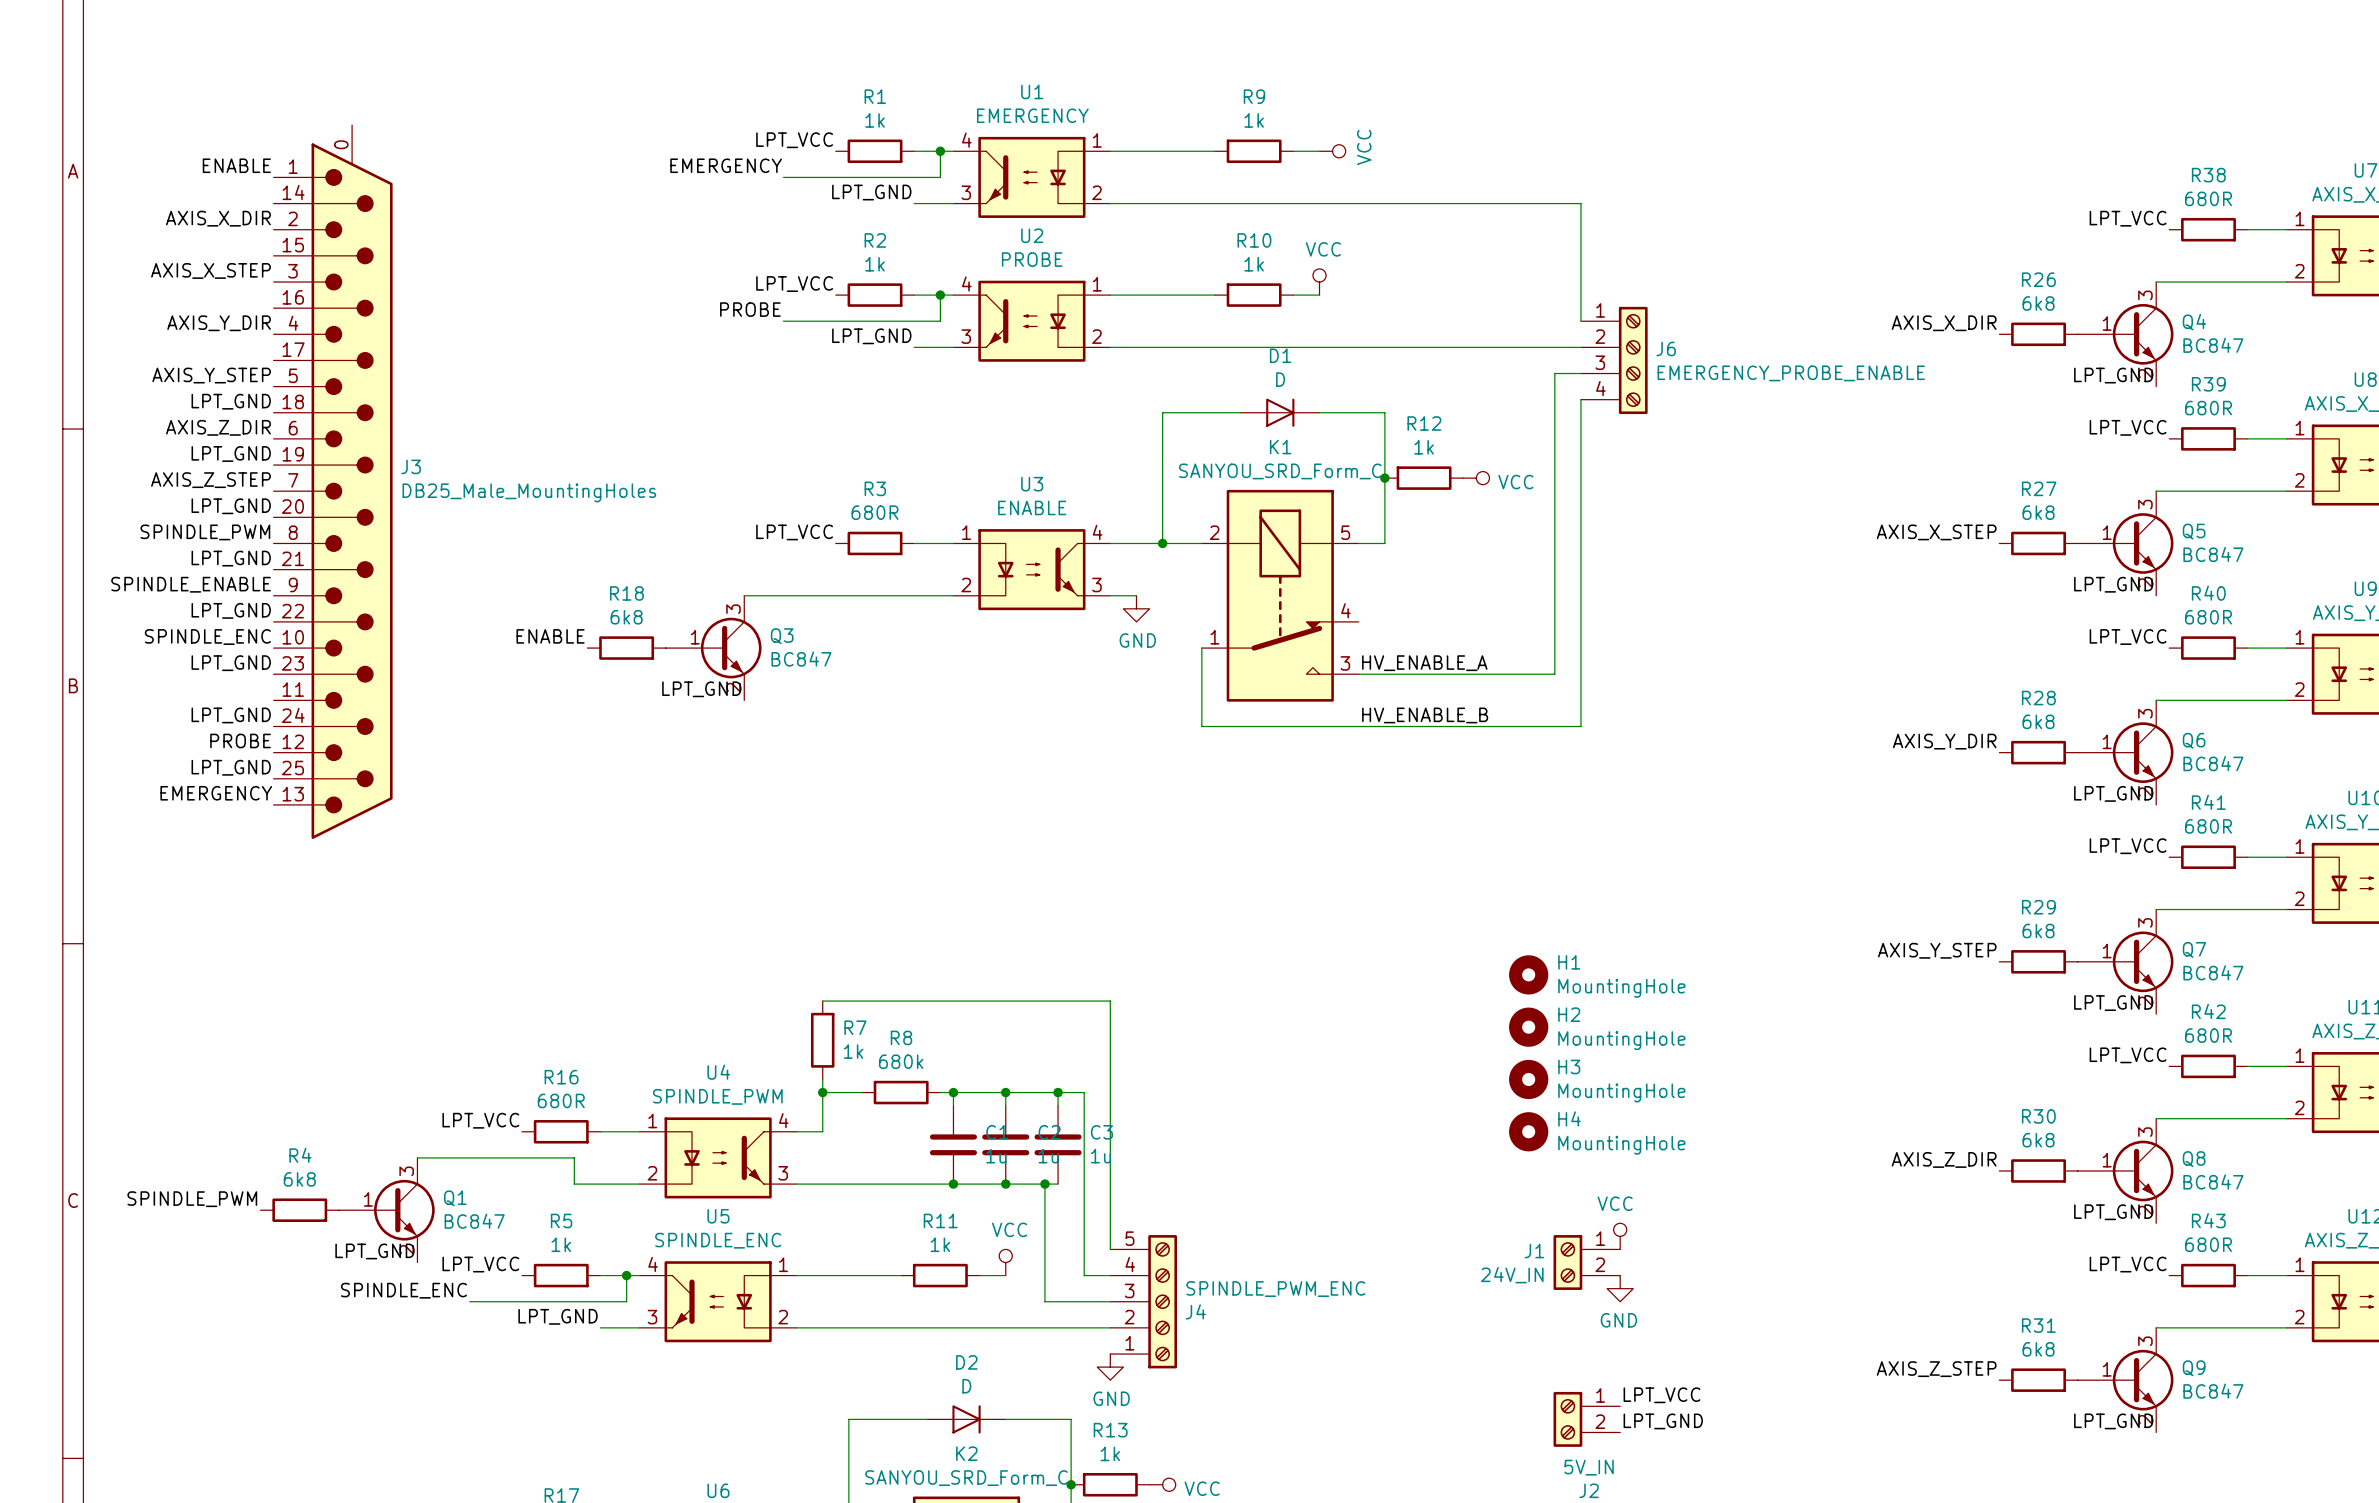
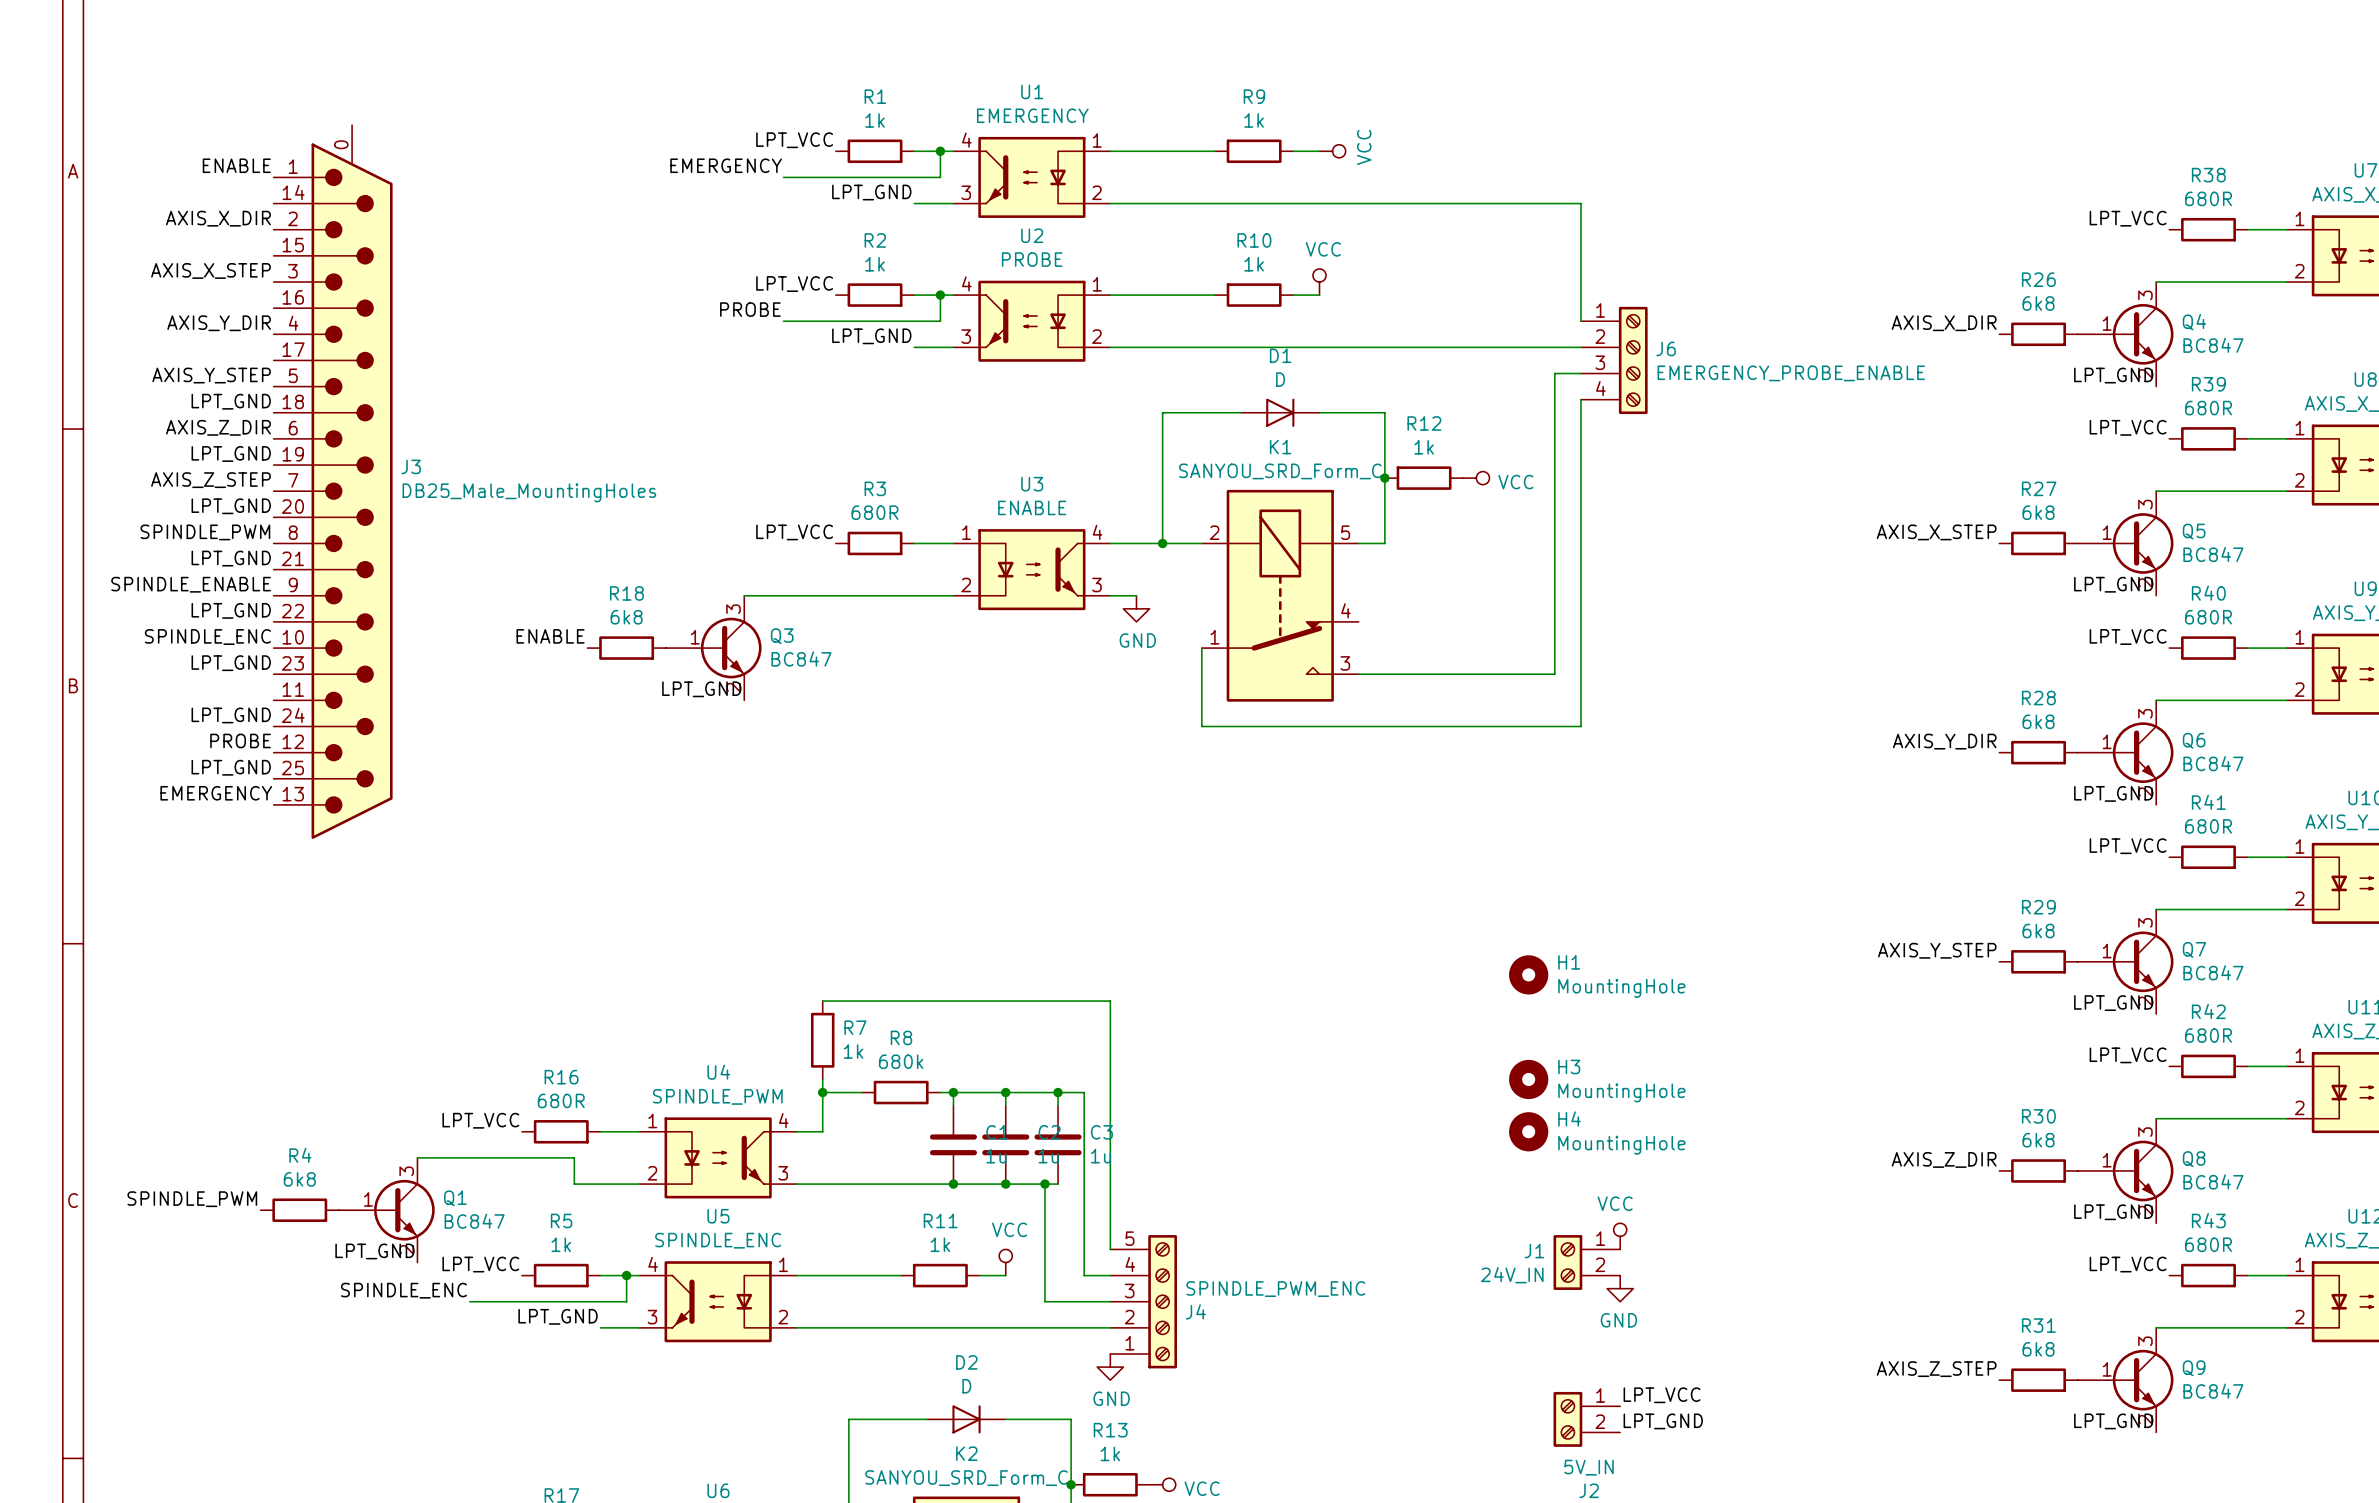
label: HV_ENABLE_A (1424, 663) -> none
label: HV_ENABLE_B (1425, 715) -> none
H2: MountingHole (1528, 1027) -> none

